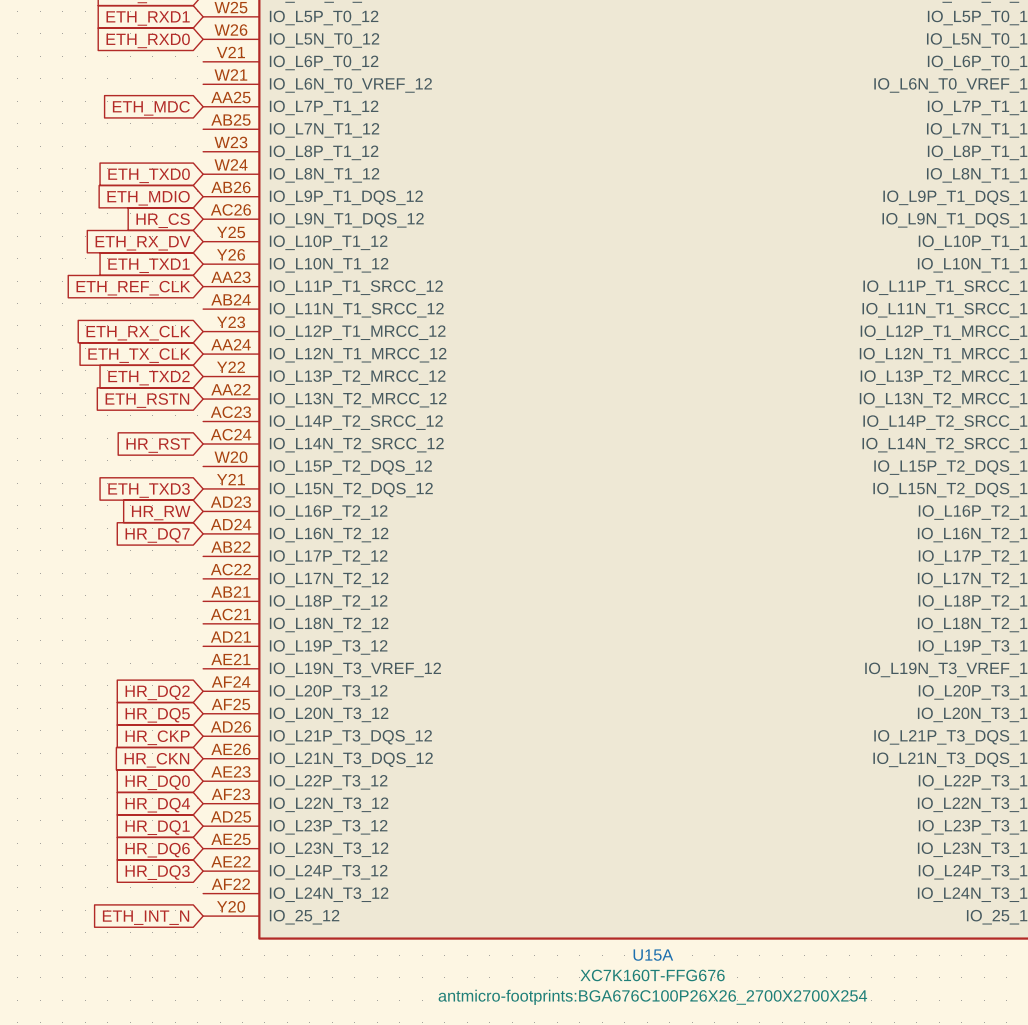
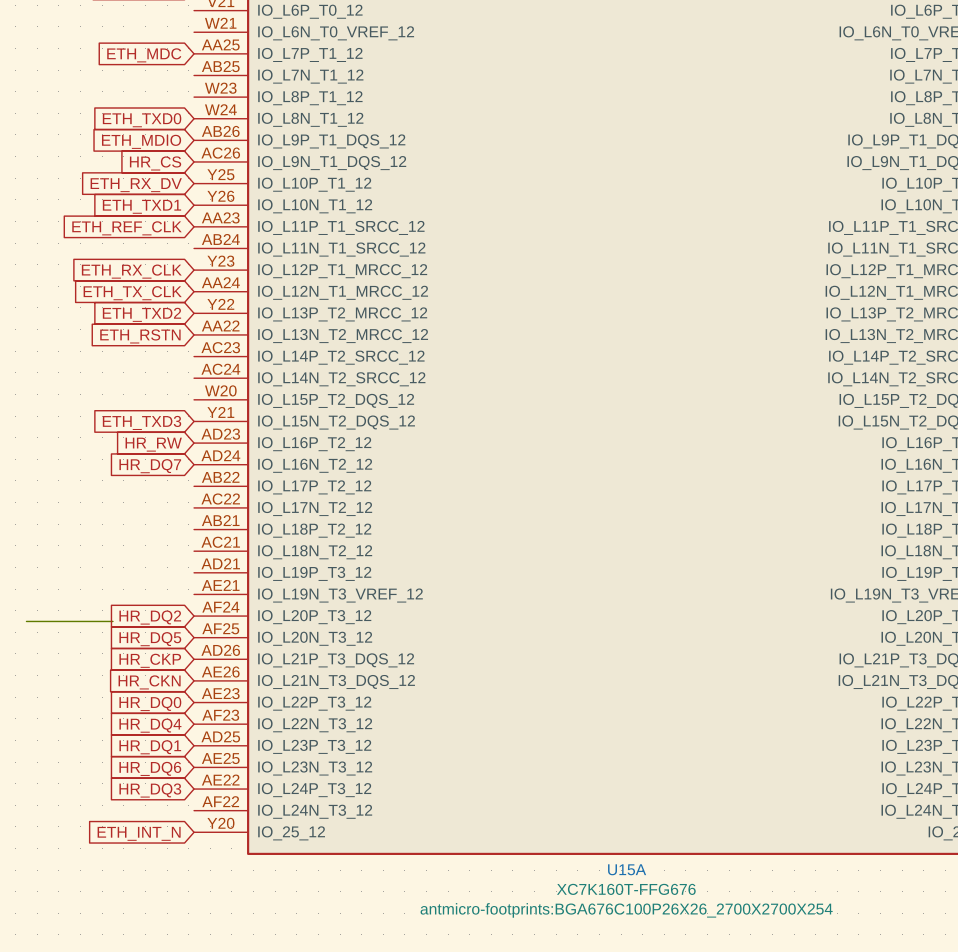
global label: HR_RST (158, 445) -> none
wire: none -> (26, 621) (112, 621)

